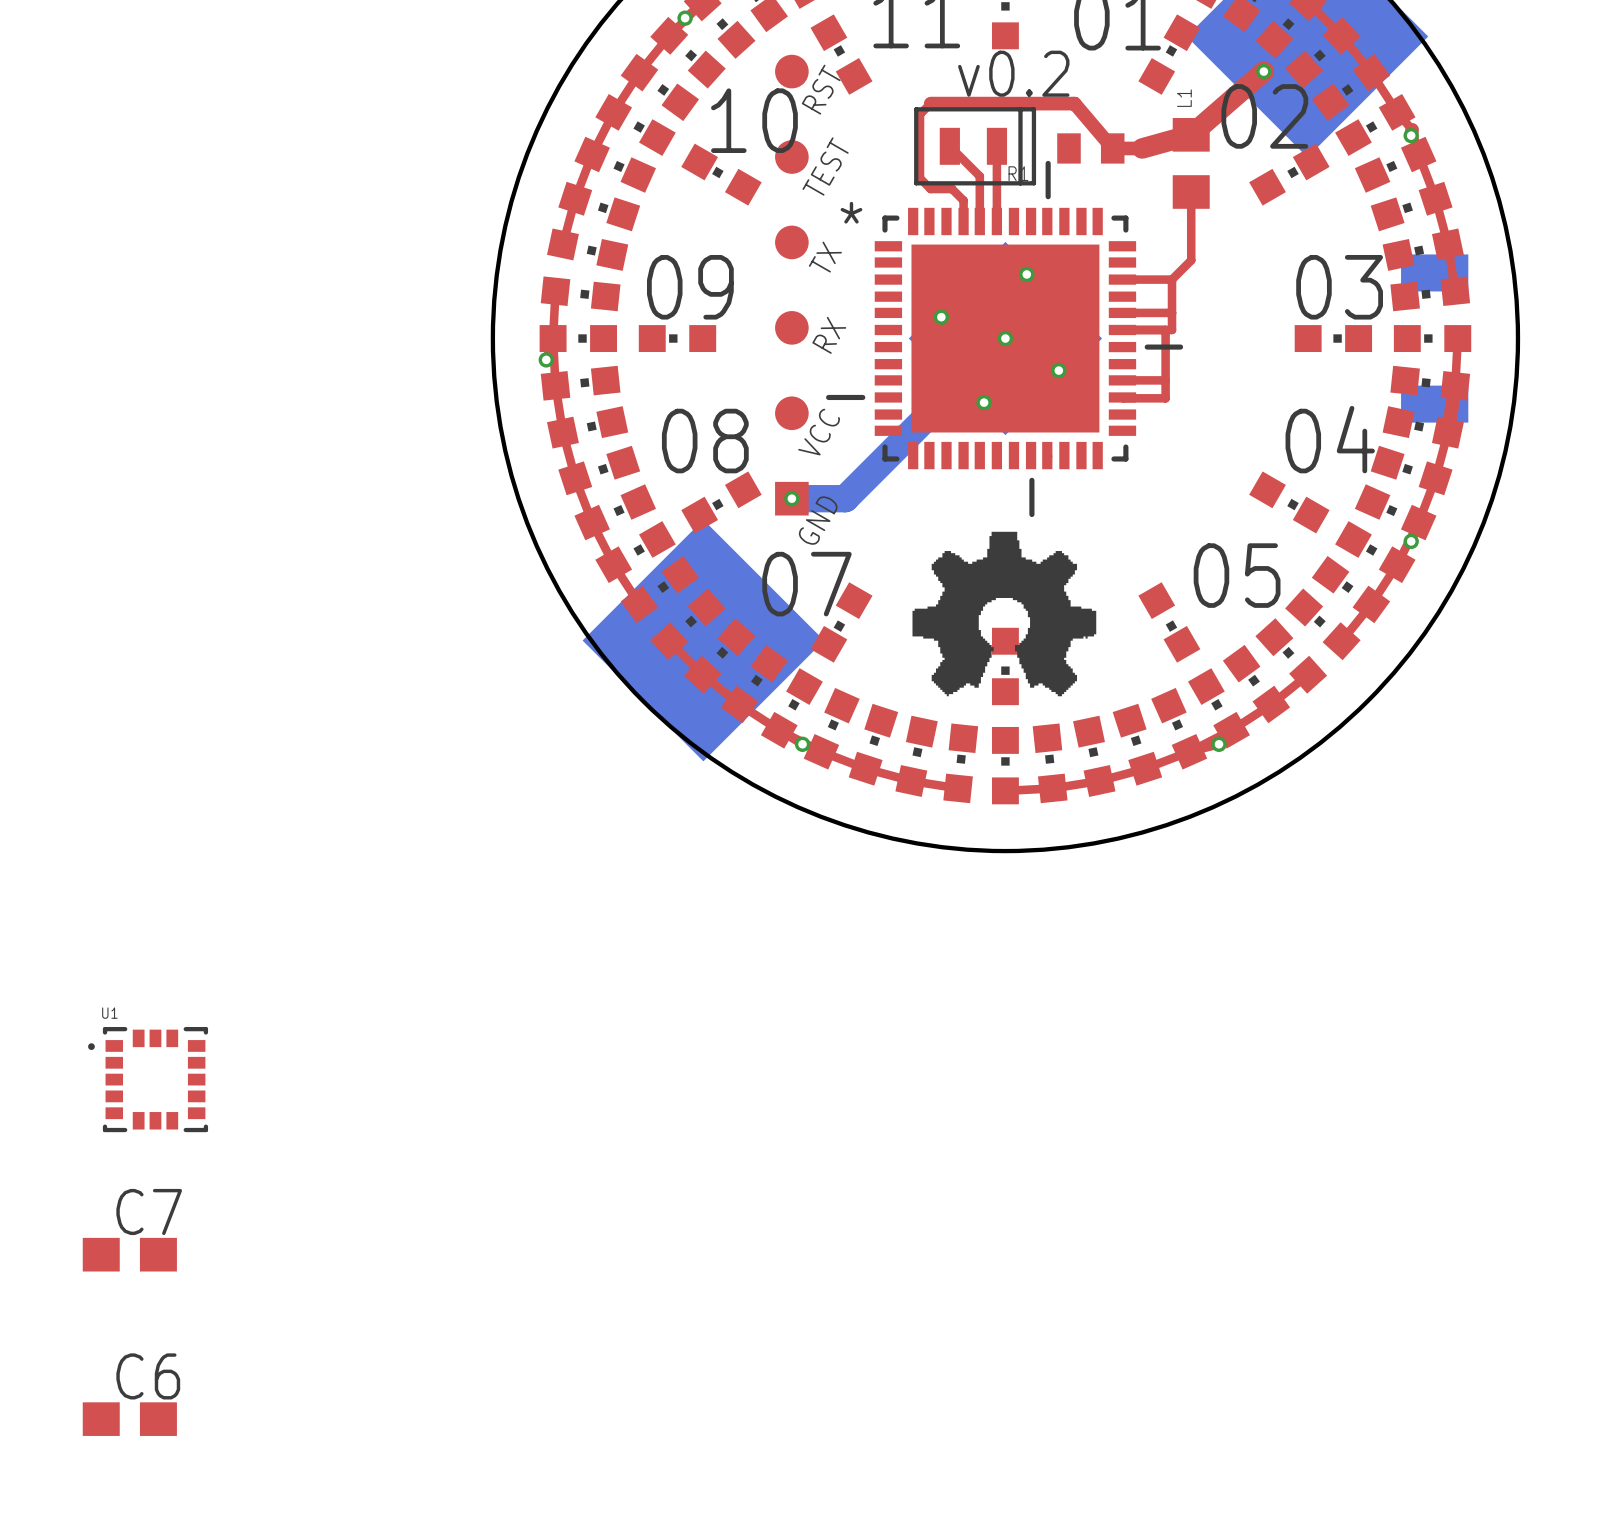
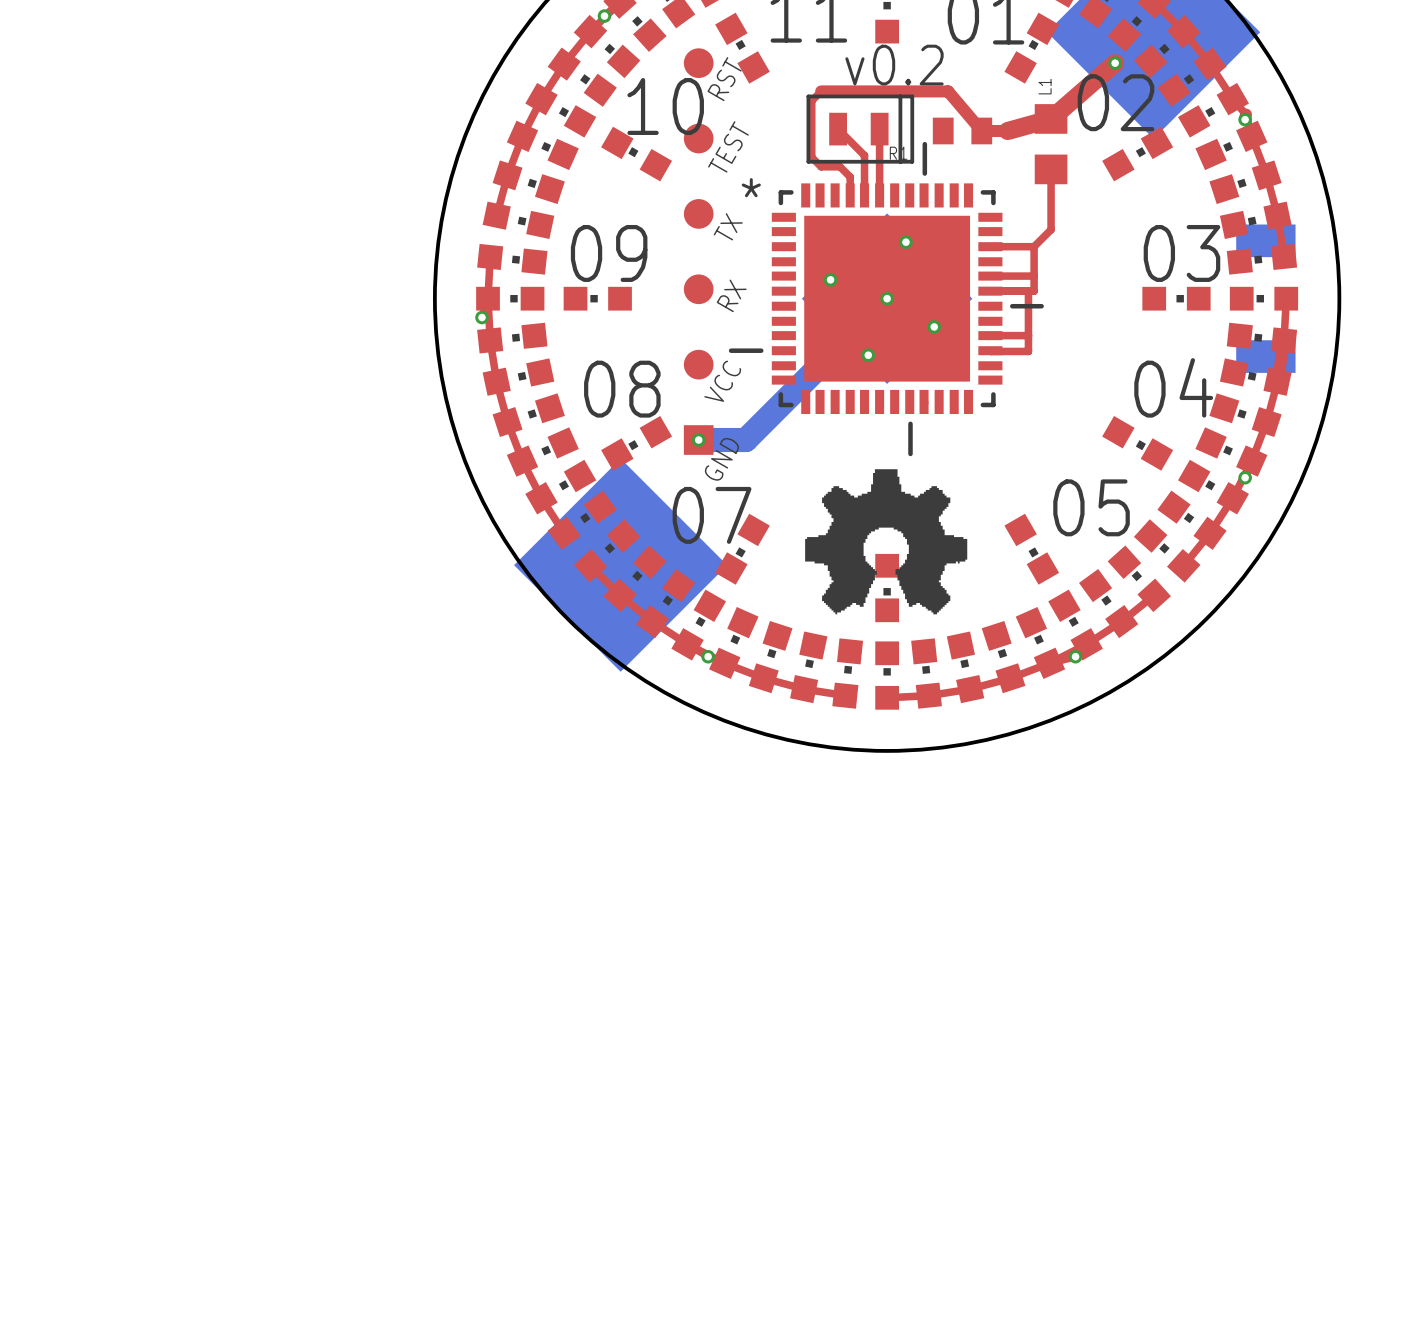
U1: (148, 1079) -> none
C7: (129, 1254) -> none
C6: (129, 1419) -> none

